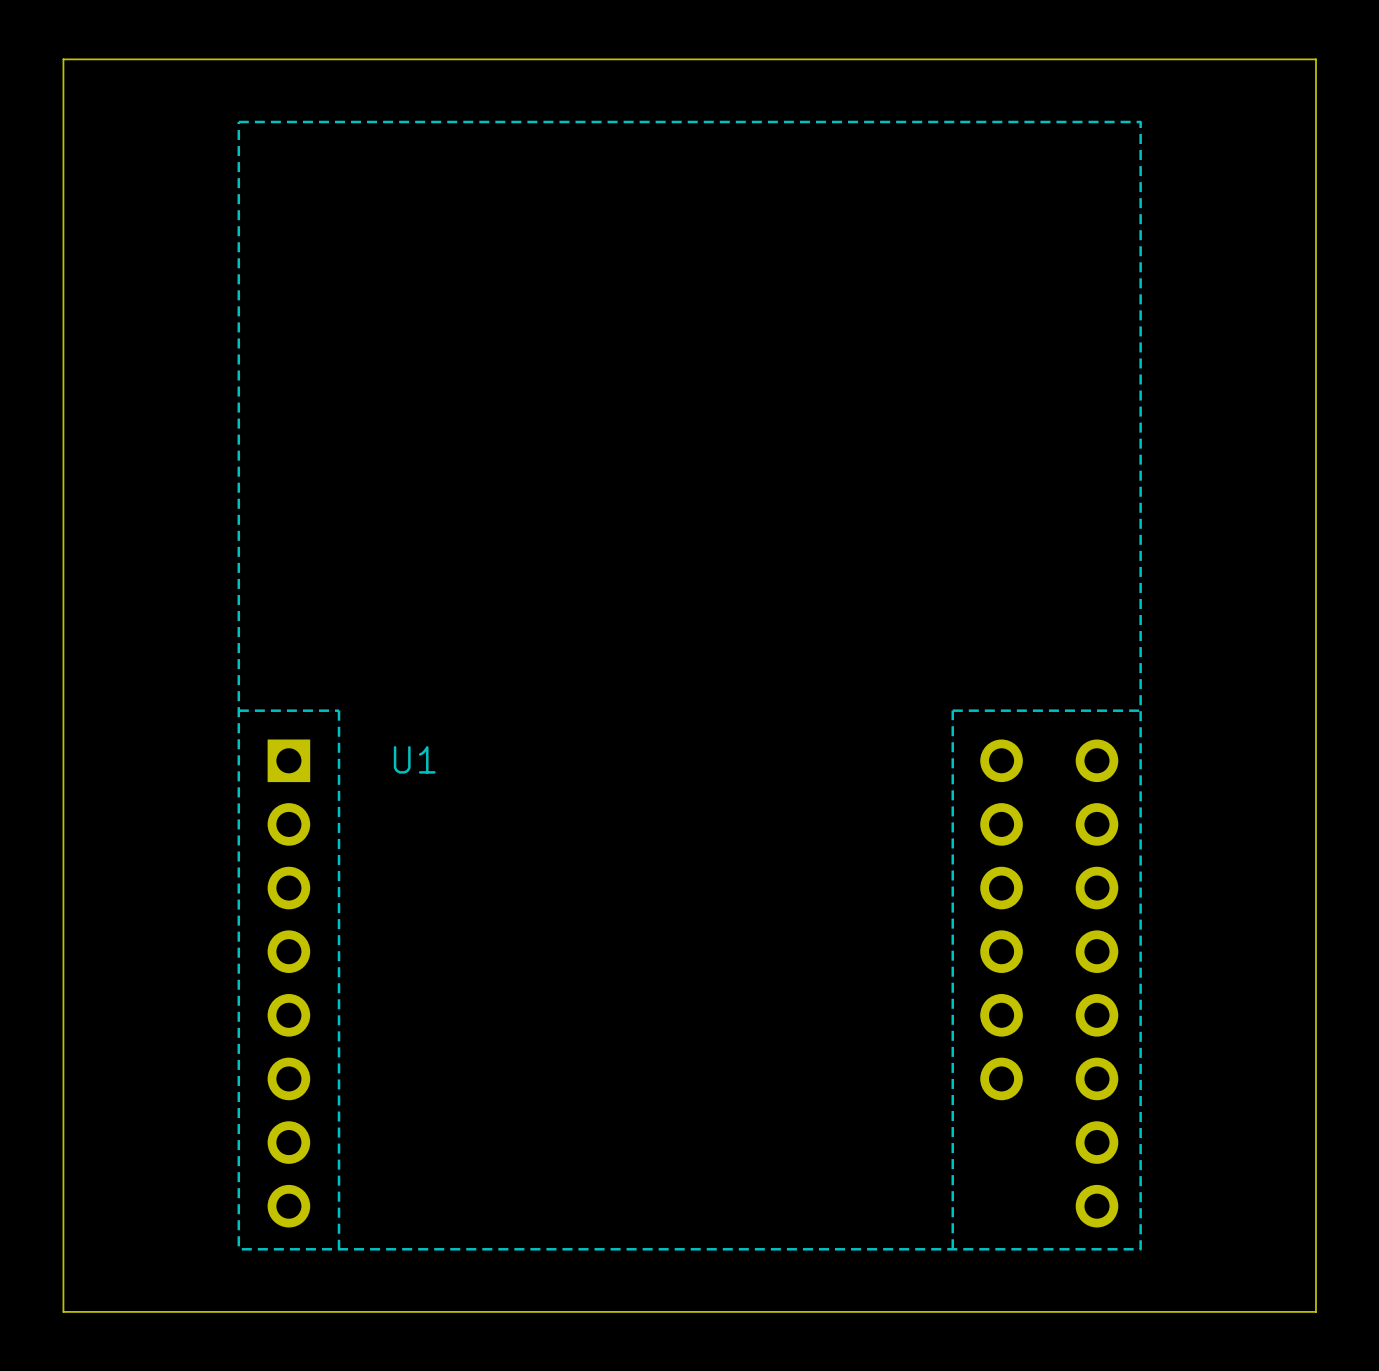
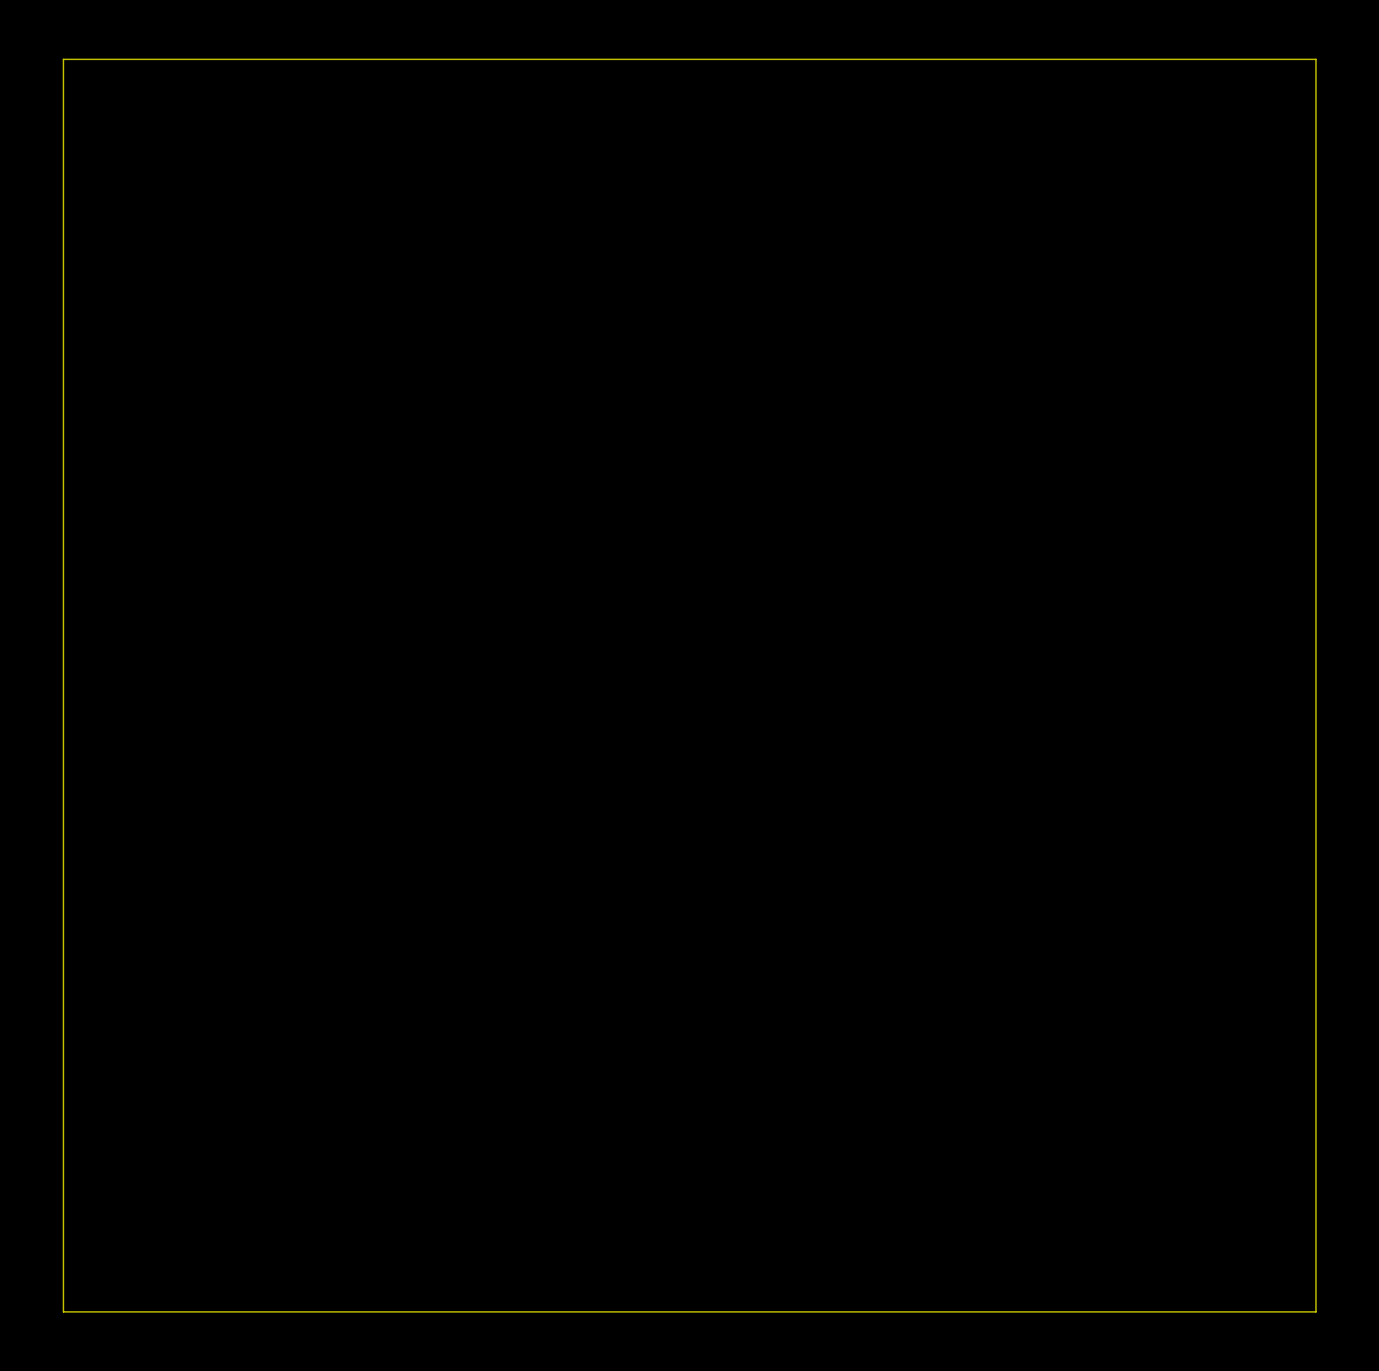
U1: (689, 685) -> none

